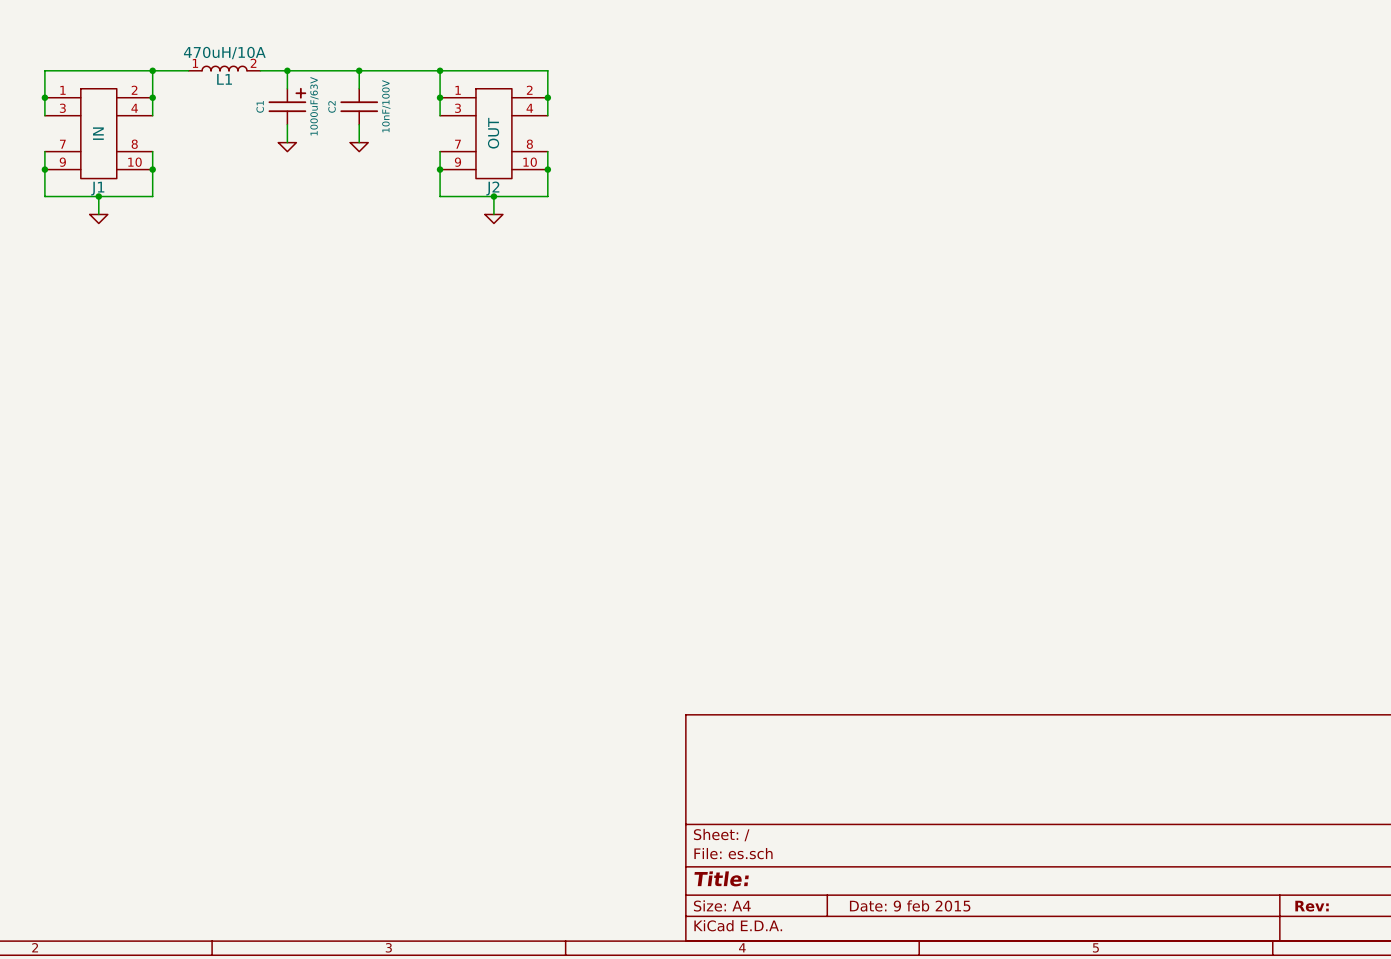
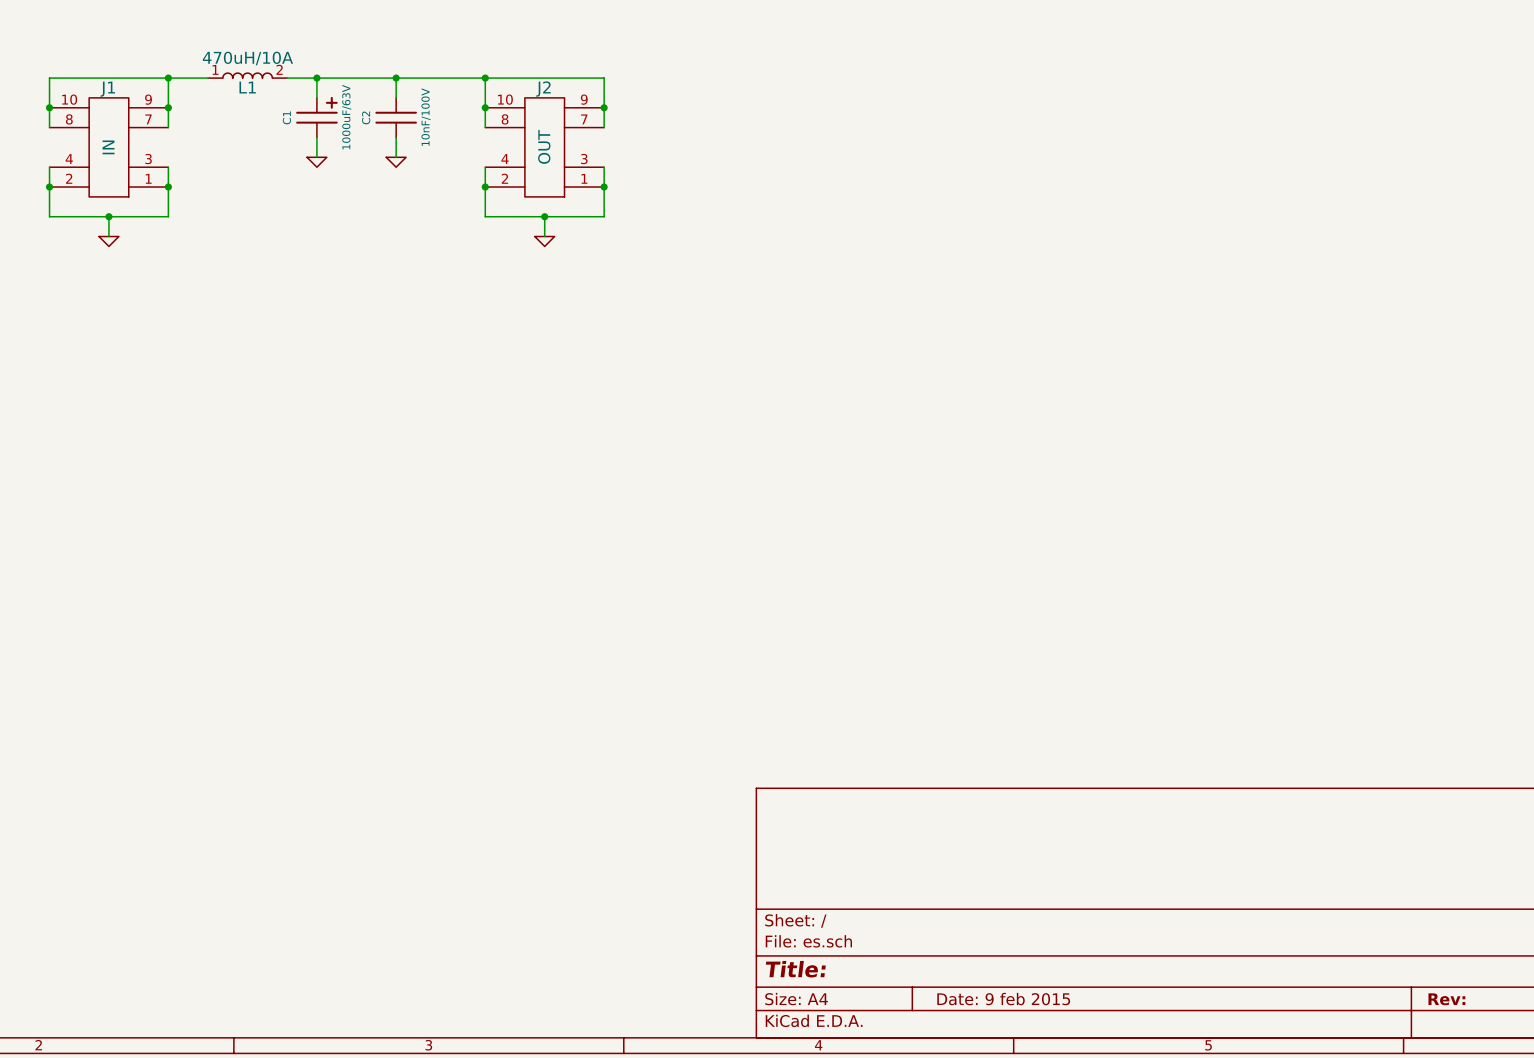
J1 rotation: 0° (98, 133) -> 180° (108, 147)
J2 rotation: 0° (493, 133) -> 180° (544, 147)

